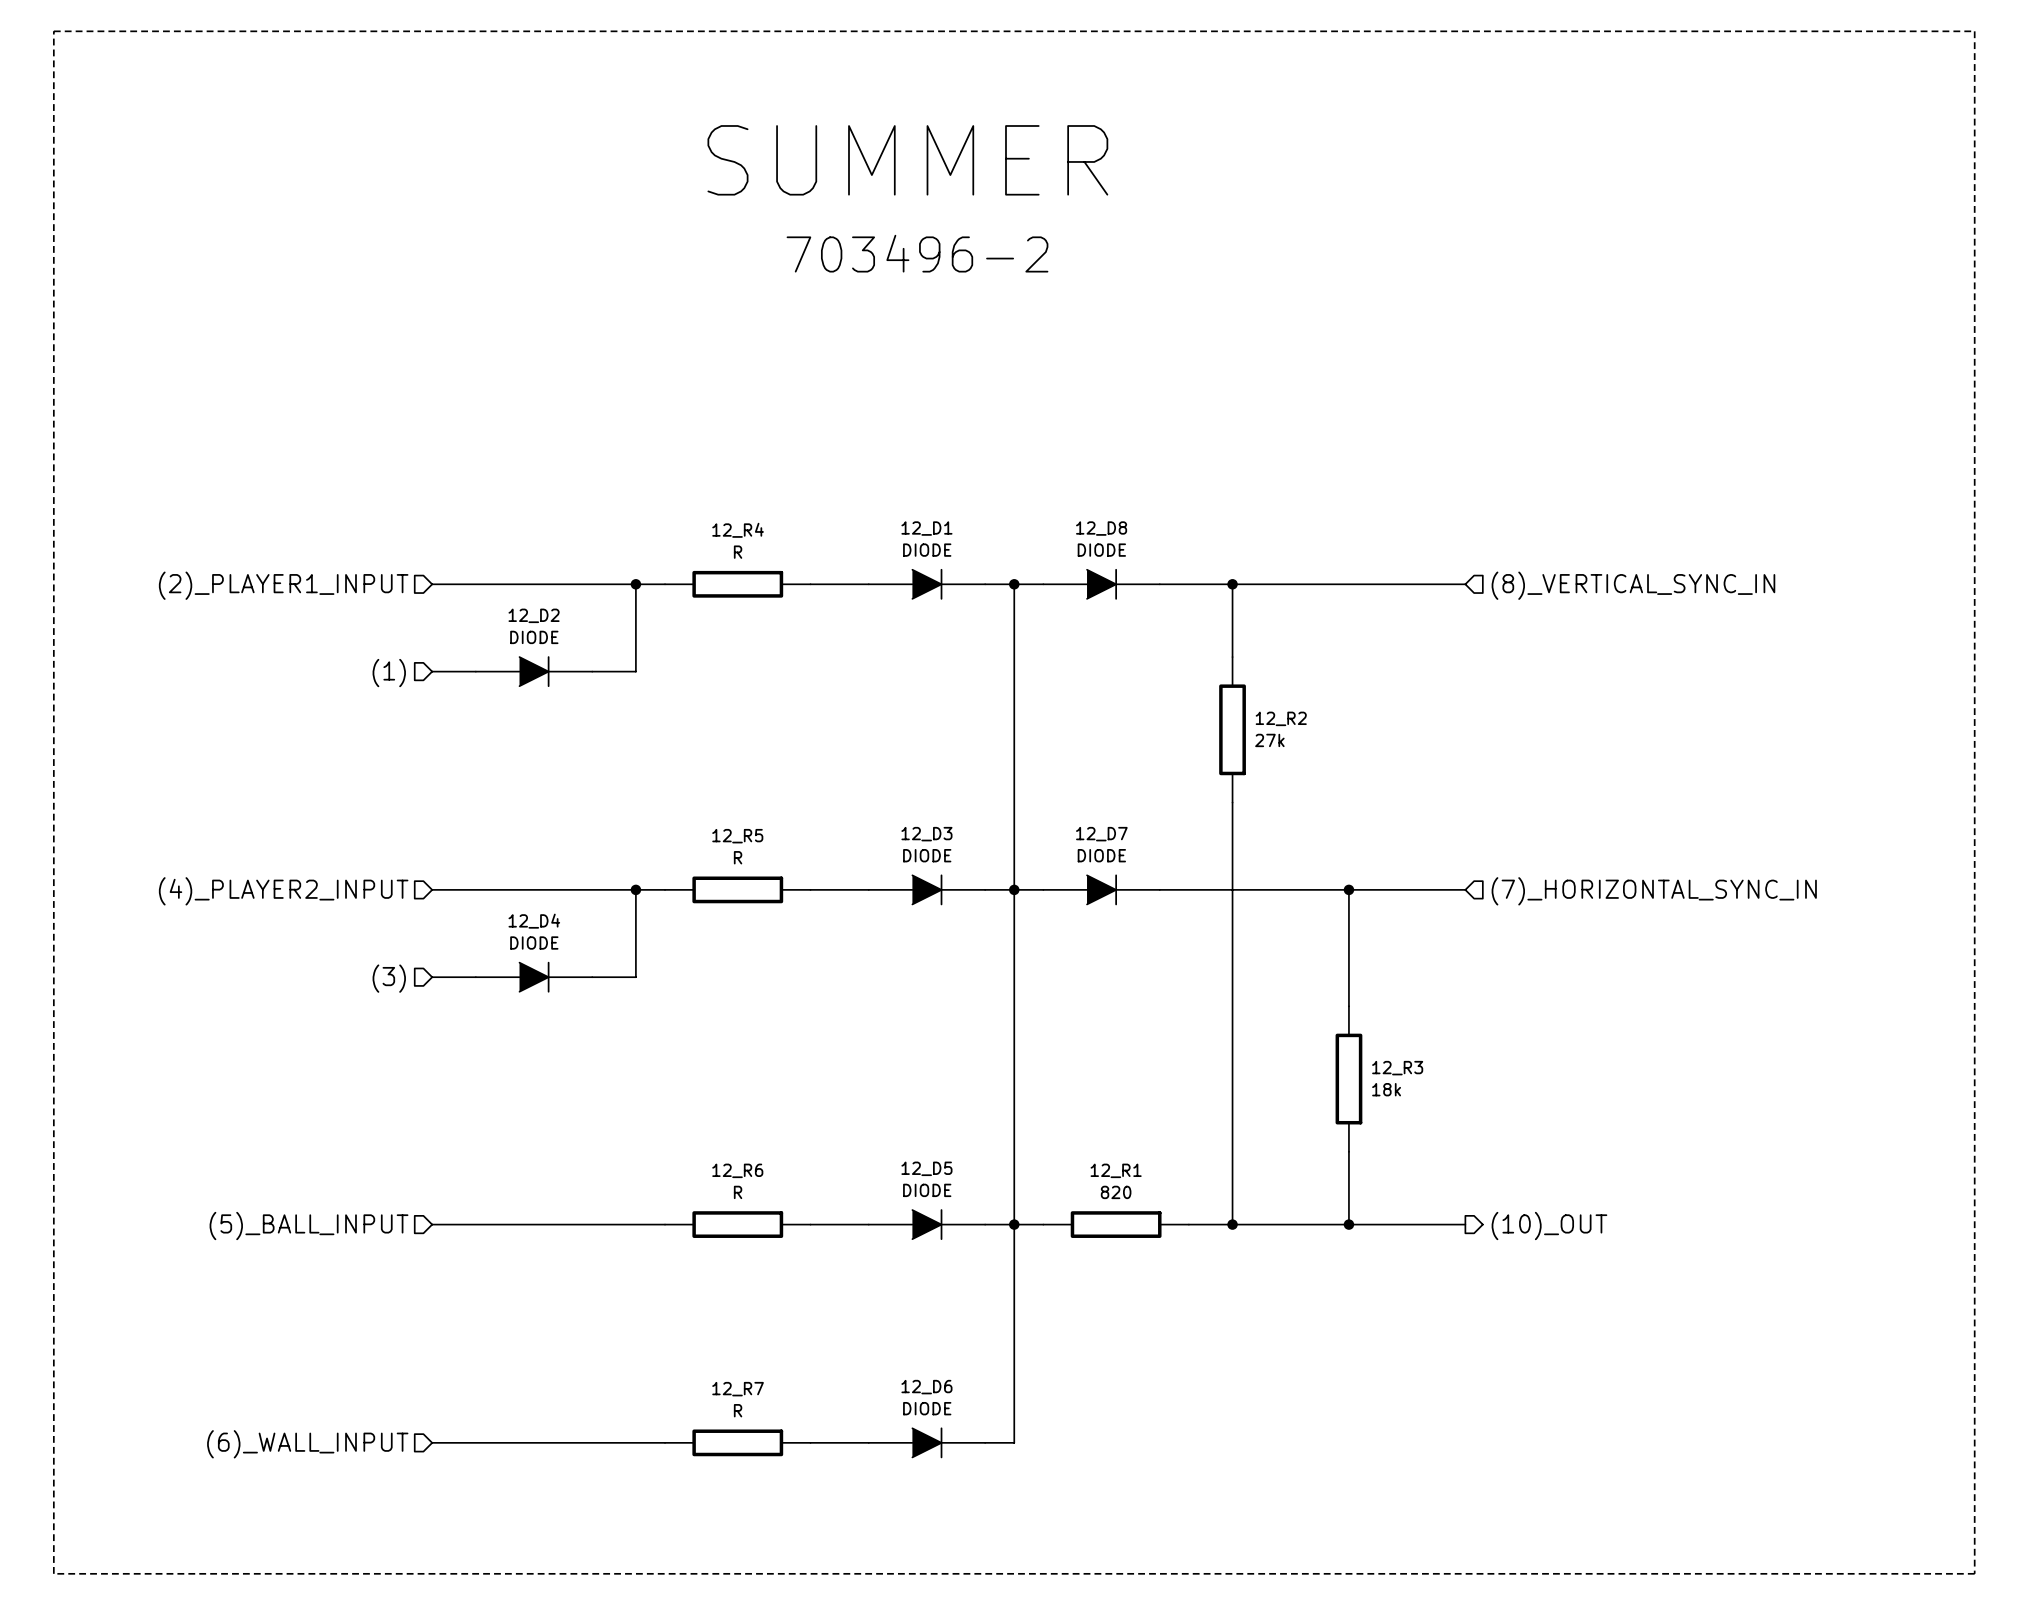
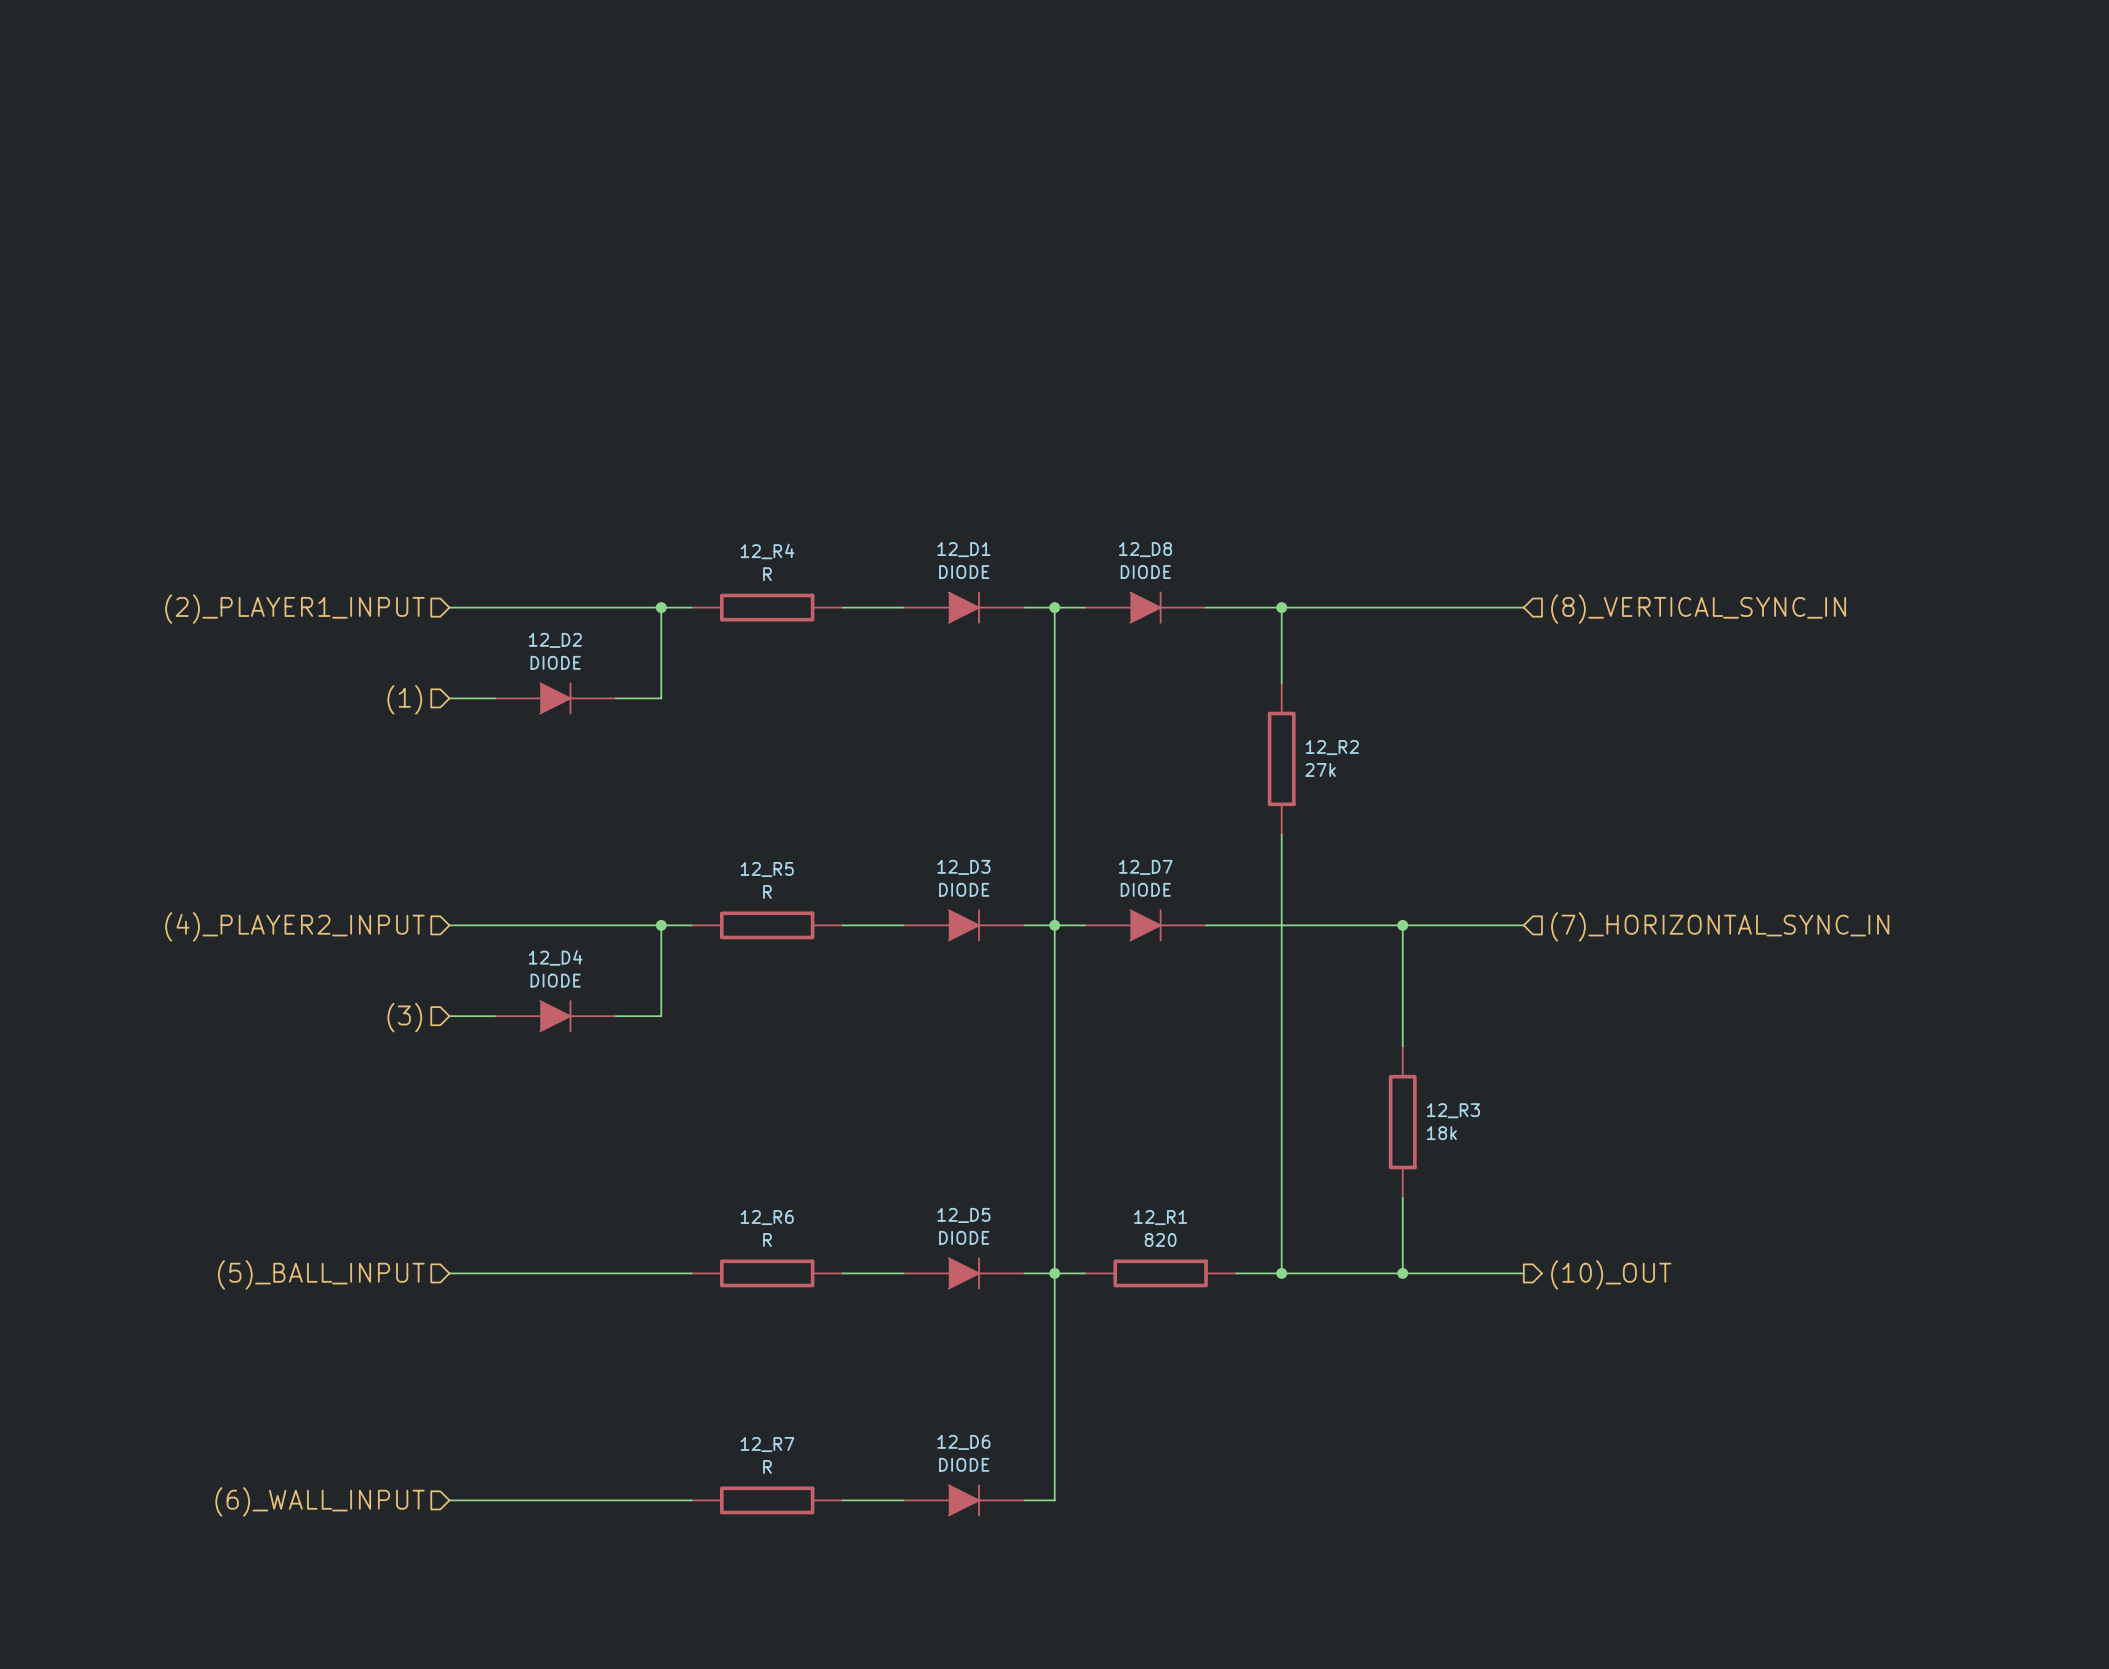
line: (53, 31) (53, 1573) (1974, 1573) (1974, 31) (53, 31) -> none
text: SUMMER (907, 160) -> none
text: 703496-2 (917, 253) -> none

